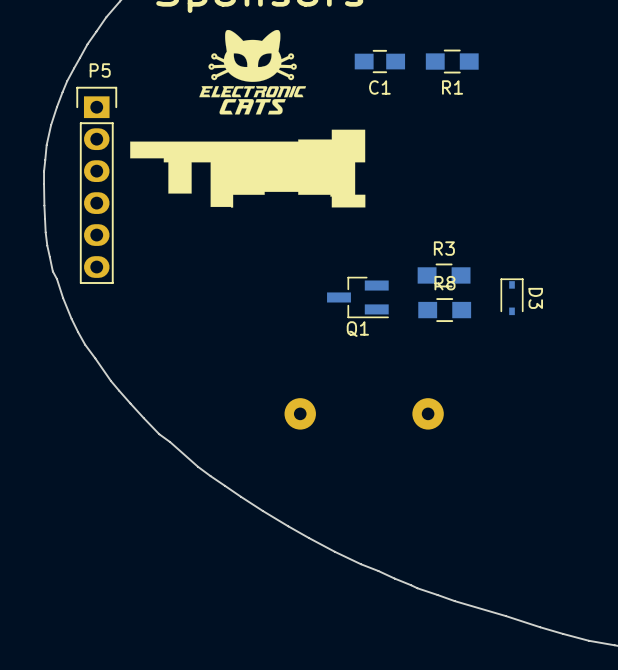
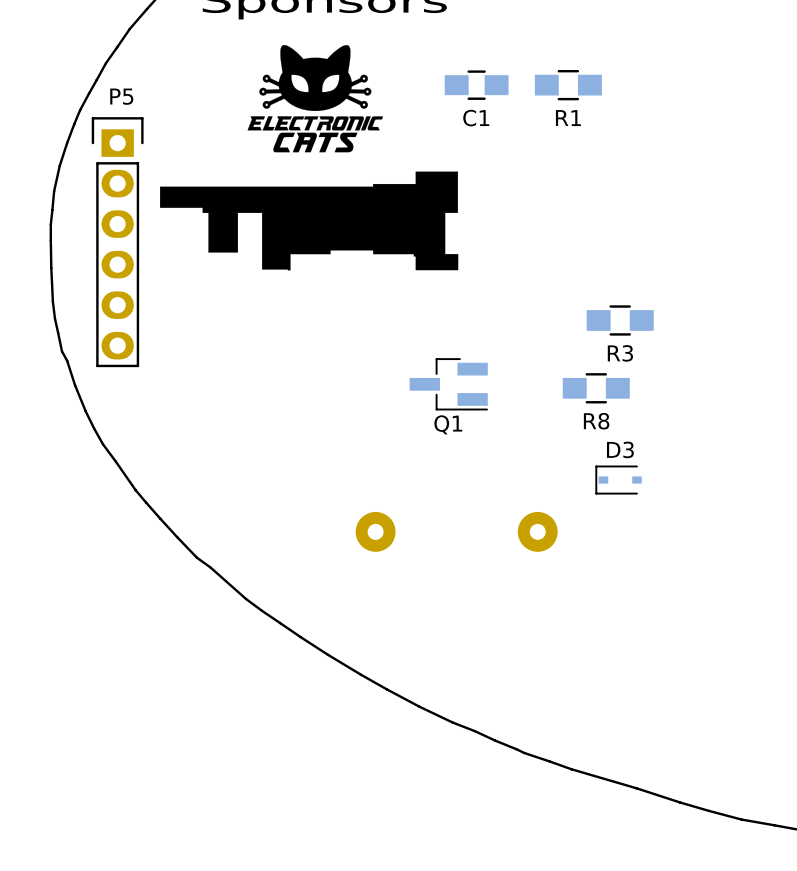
R3 name position: R3 (444, 248) -> R3 (620, 353)
R3 position: (444, 275) -> (620, 320)
R8 name position: R8 (444, 283) -> R8 (596, 421)
D3 rotation: 0° (512, 296) -> 90° counterclockwise (618, 480)
D3 position: (512, 296) -> (618, 480)
R8 position: (444, 310) -> (596, 388)

